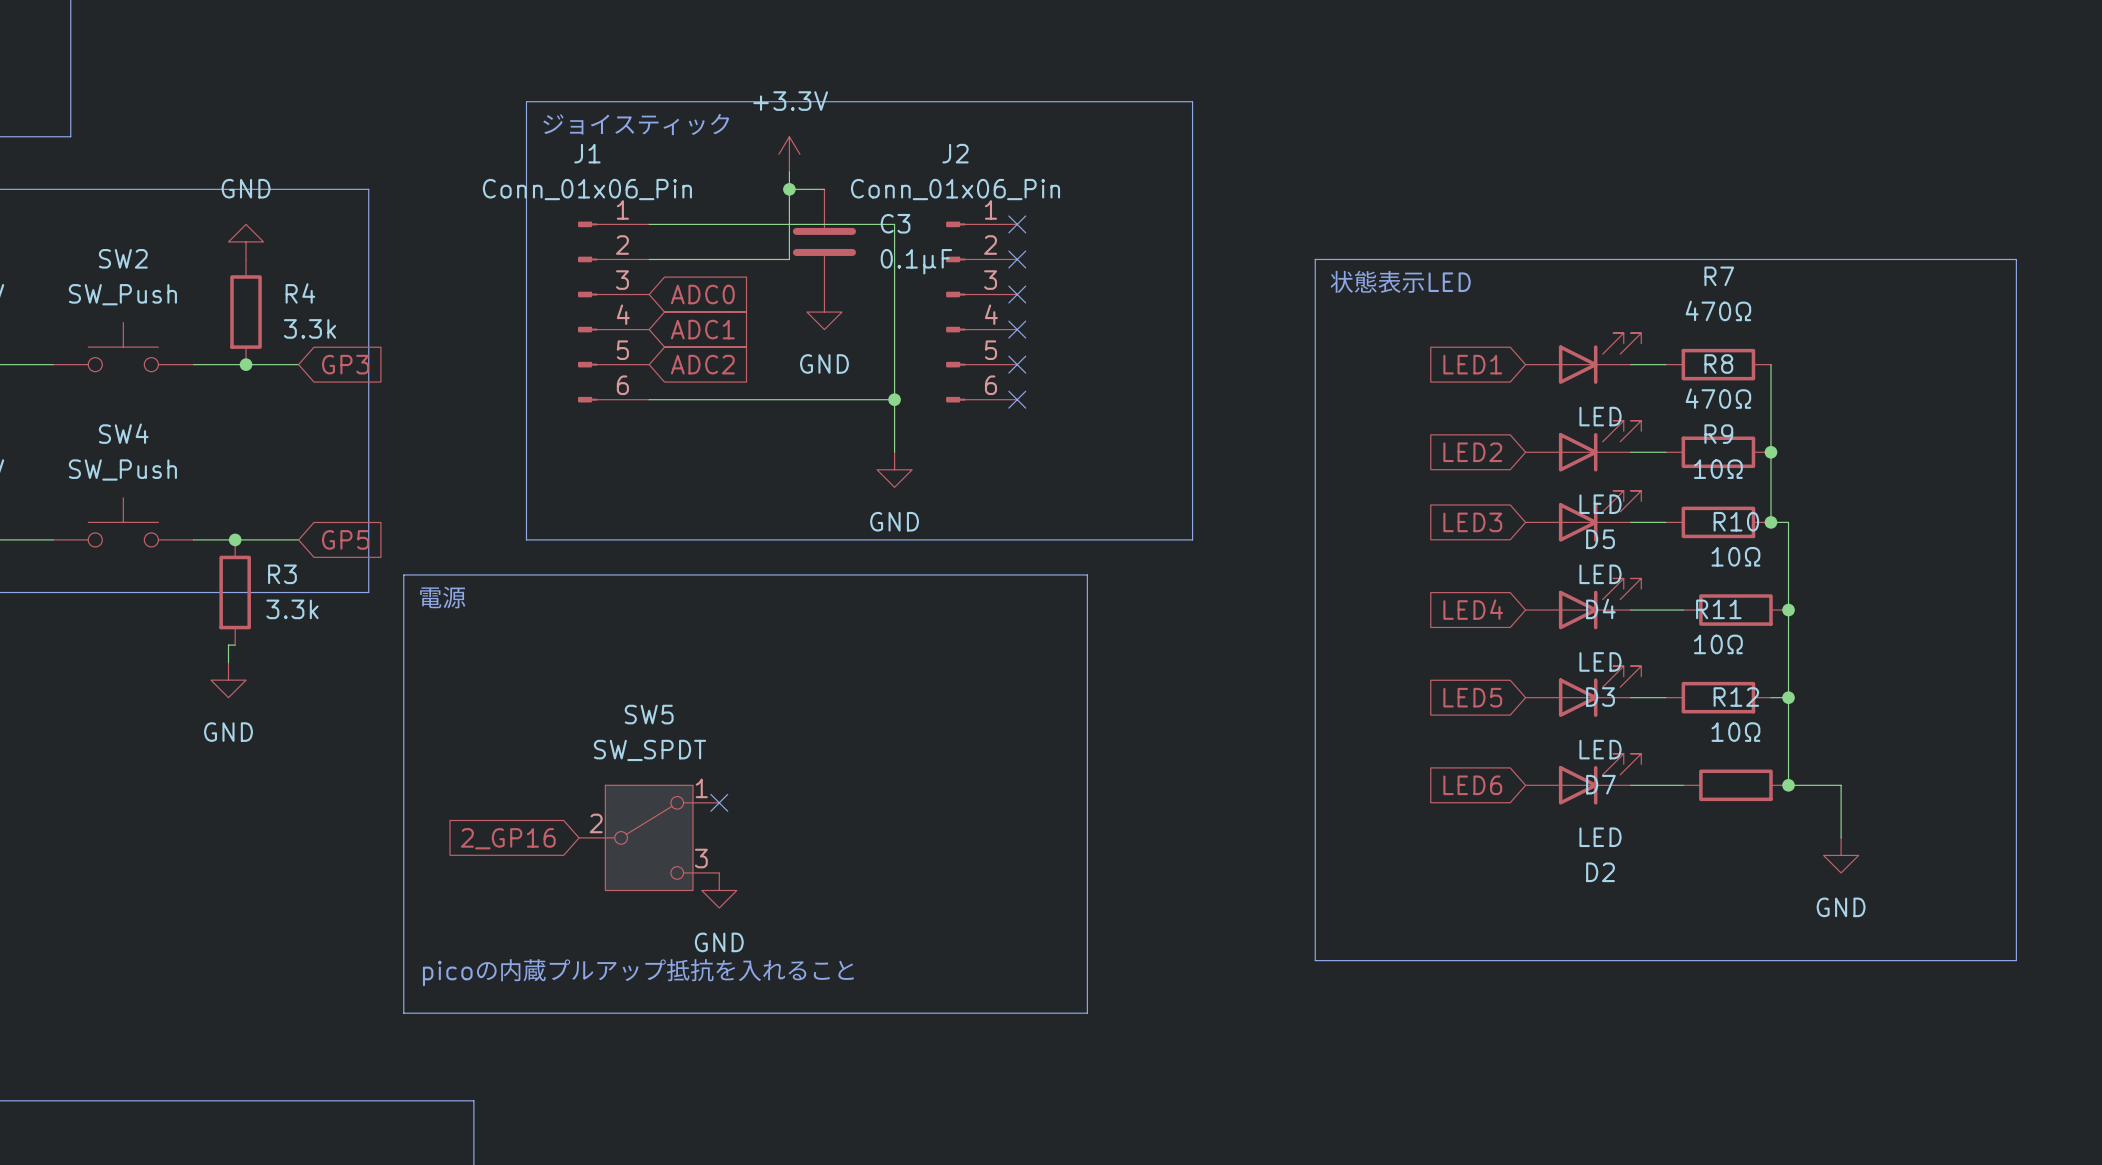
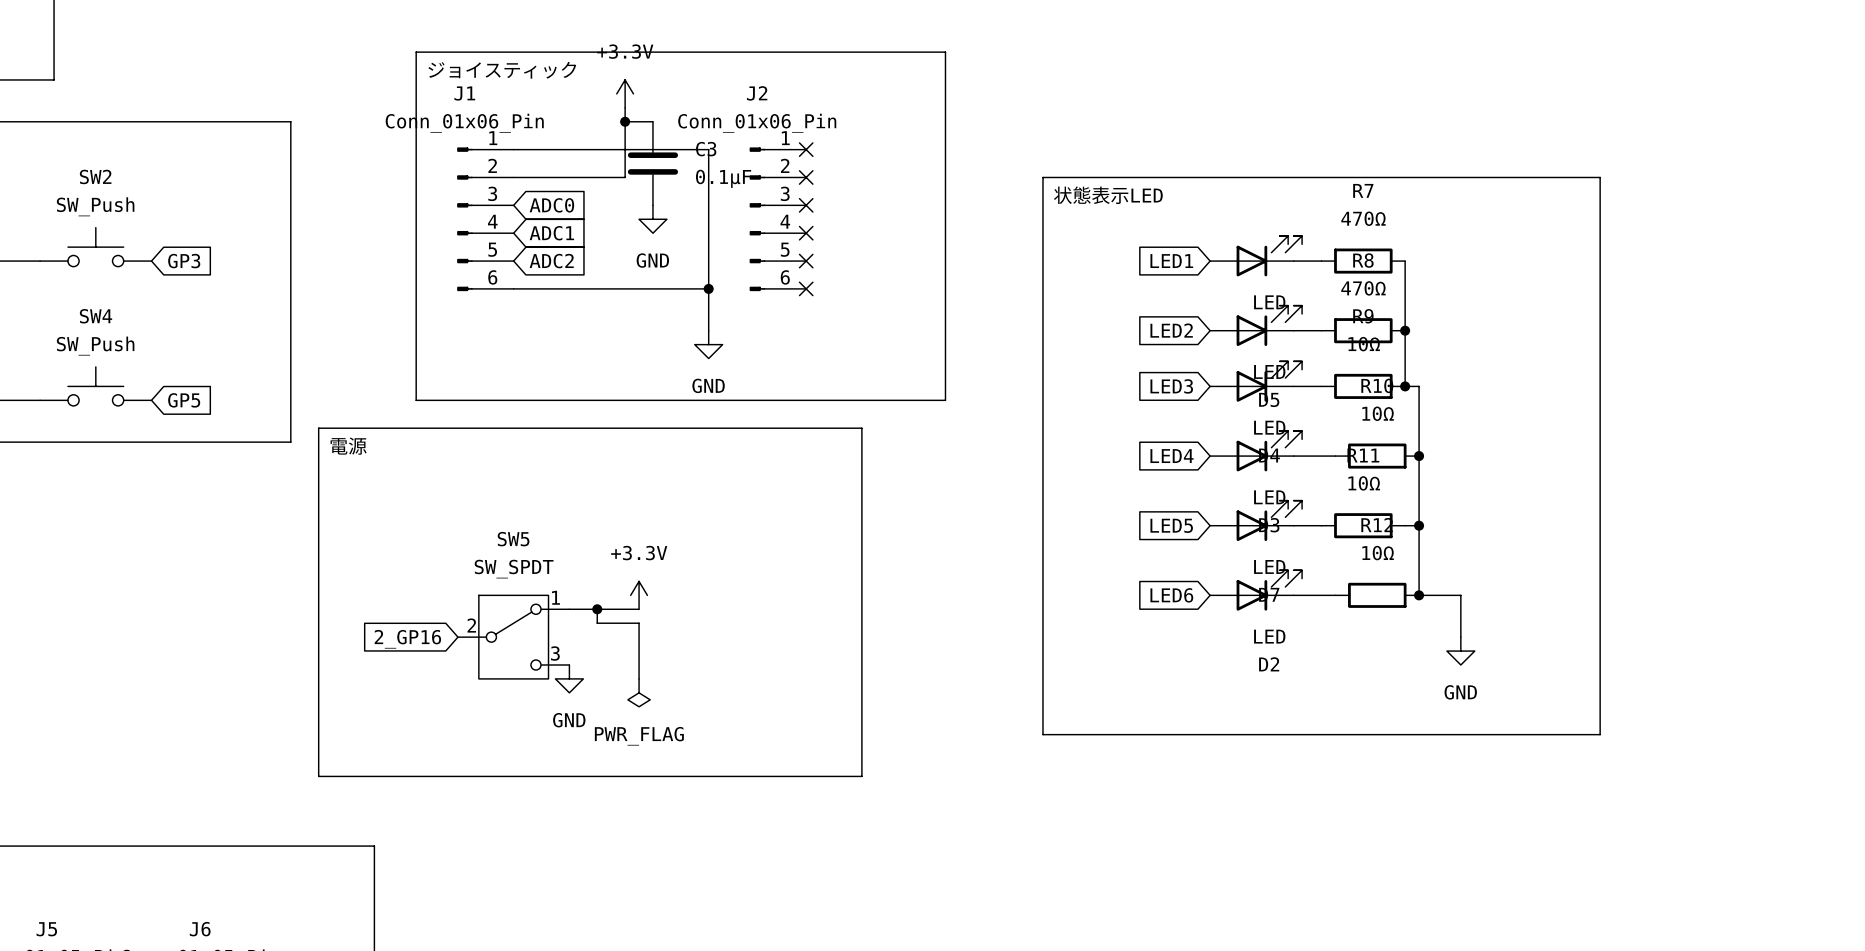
power symbol: GND (246, 241) -> none
R4: 3.3k (246, 312) -> none
wire: (193, 364) (298, 364) -> none
junction: (246, 364) -> none
global label position: GP3 (345, 364) -> GP3 (184, 261)
wire: (193, 539) (298, 539) -> none
junction: (235, 539) -> none
global label position: GP5 (345, 539) -> GP5 (184, 400)
R3: 3.3k (235, 592) -> none
wire: (235, 645) (228, 645) (228, 662) -> none
power symbol: GND (228, 680) -> none
power symbol: none -> +3.3V (639, 595)
wire: none -> (569, 609) (639, 609)
no-connect mark: (719, 802) -> none
wire: none -> (597, 609) (597, 623) (639, 623) (639, 678)
junction: none -> (597, 609)
power symbol: none -> PWR_FLAG (639, 692)
text: picoの内蔵プルアップ抵抗を入れること (638, 972) -> none

